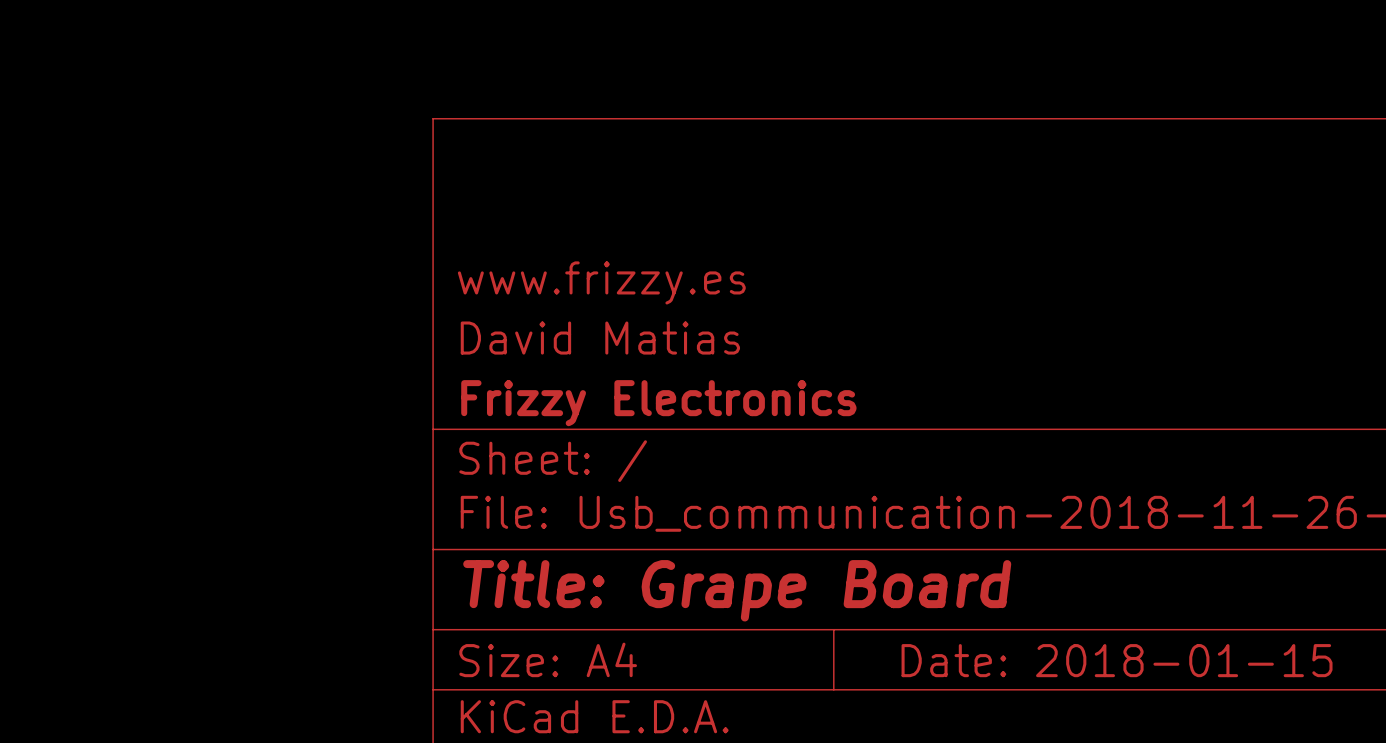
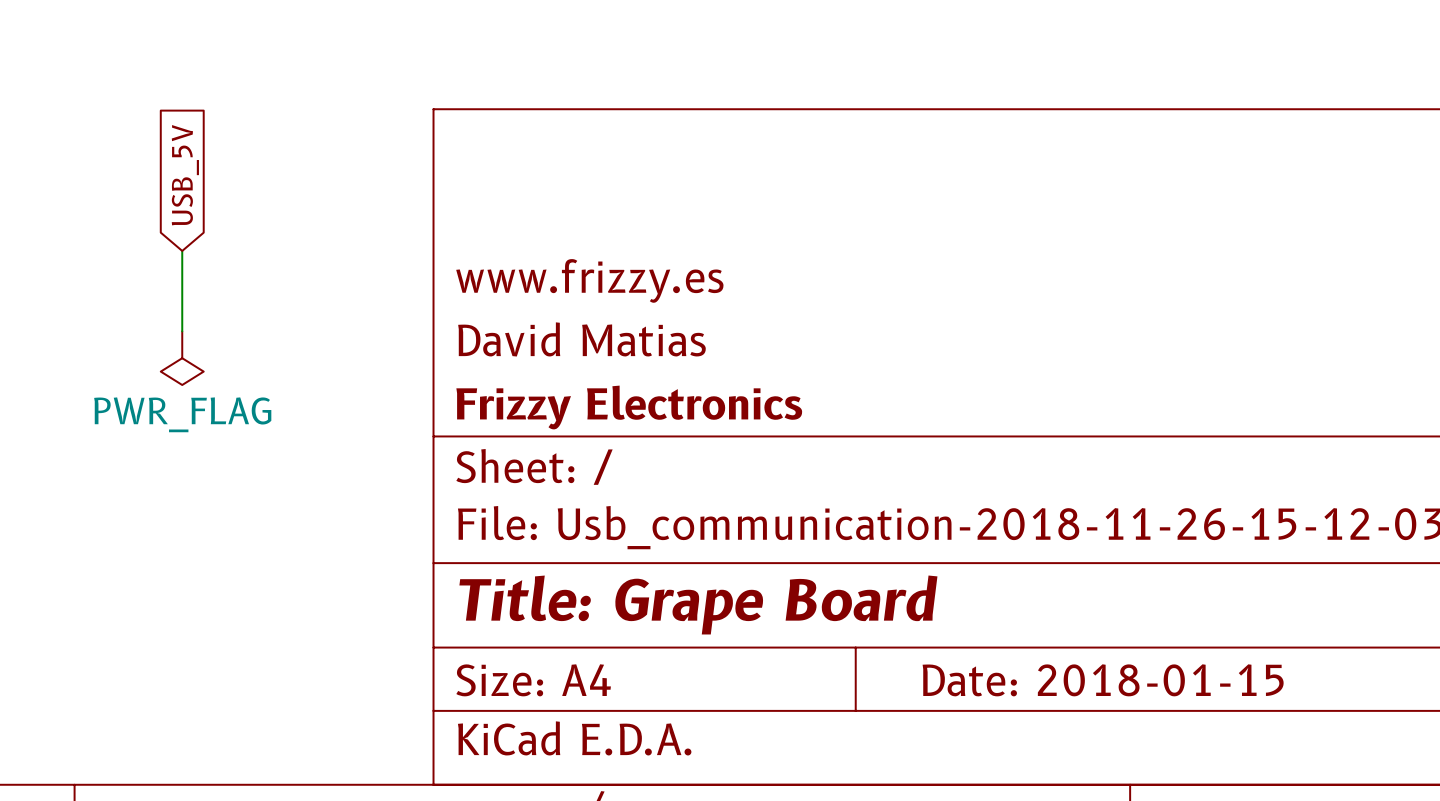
global label: none -> USB_5V (185, 175)
wire: none -> (182, 250) (182, 331)
power symbol: none -> PWR_FLAG (182, 358)

